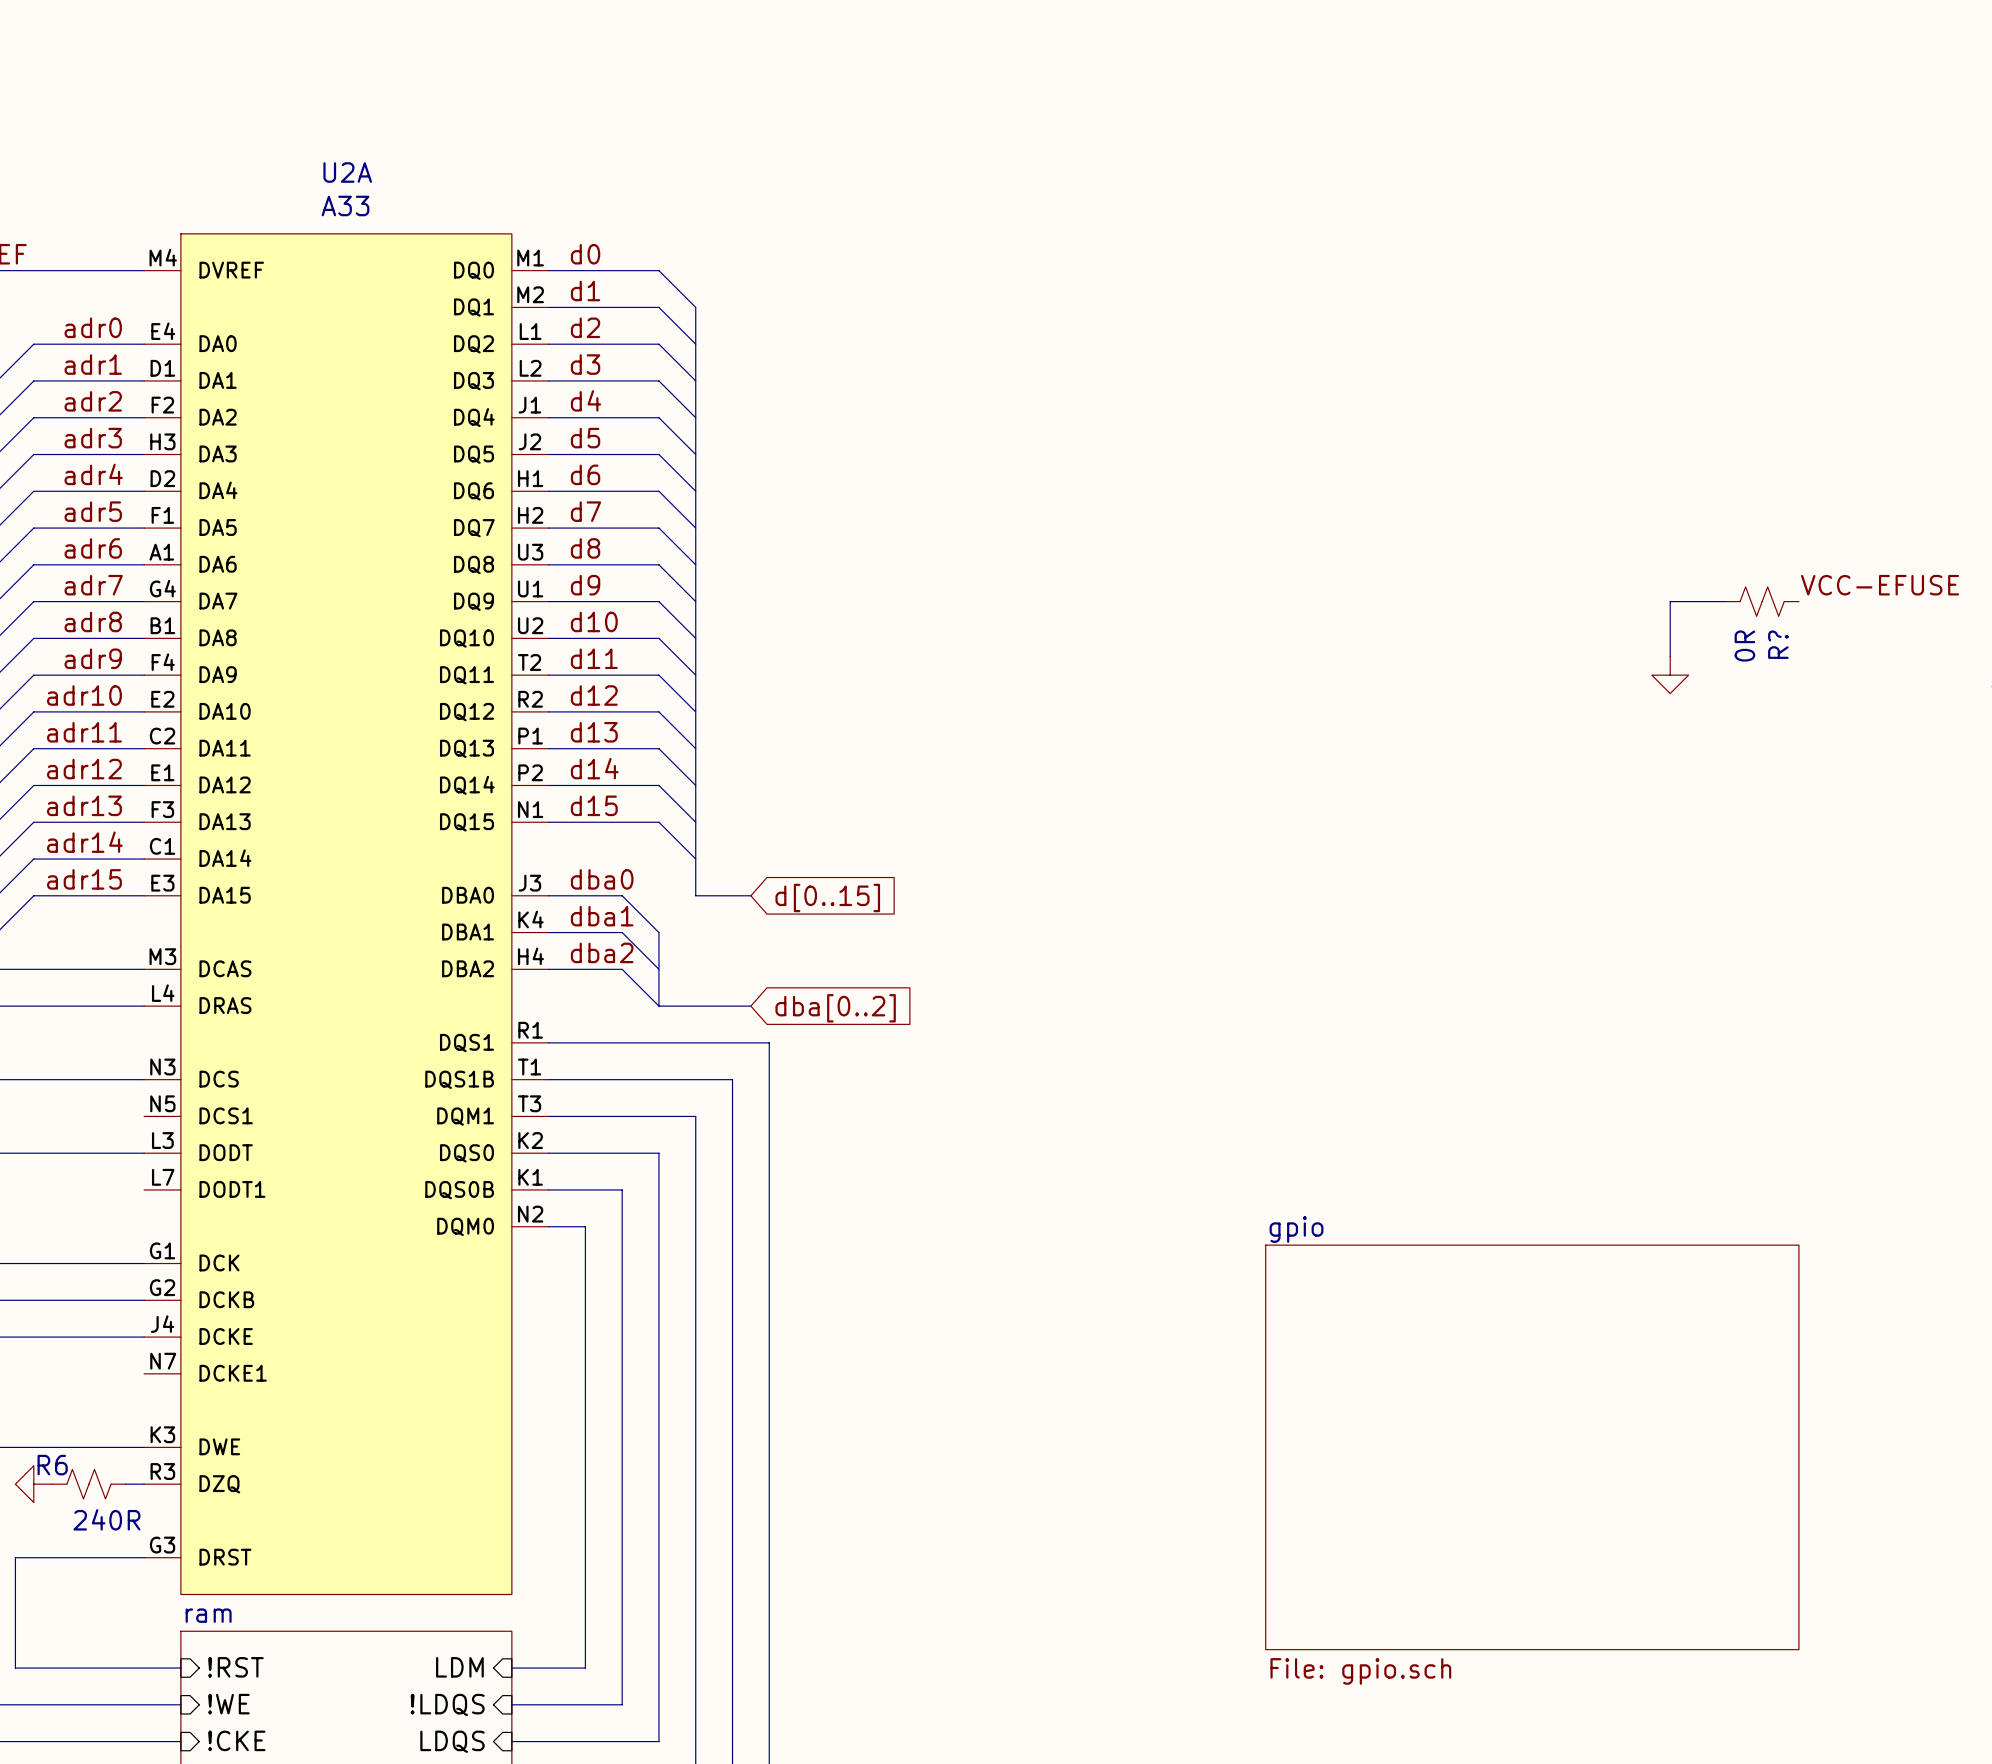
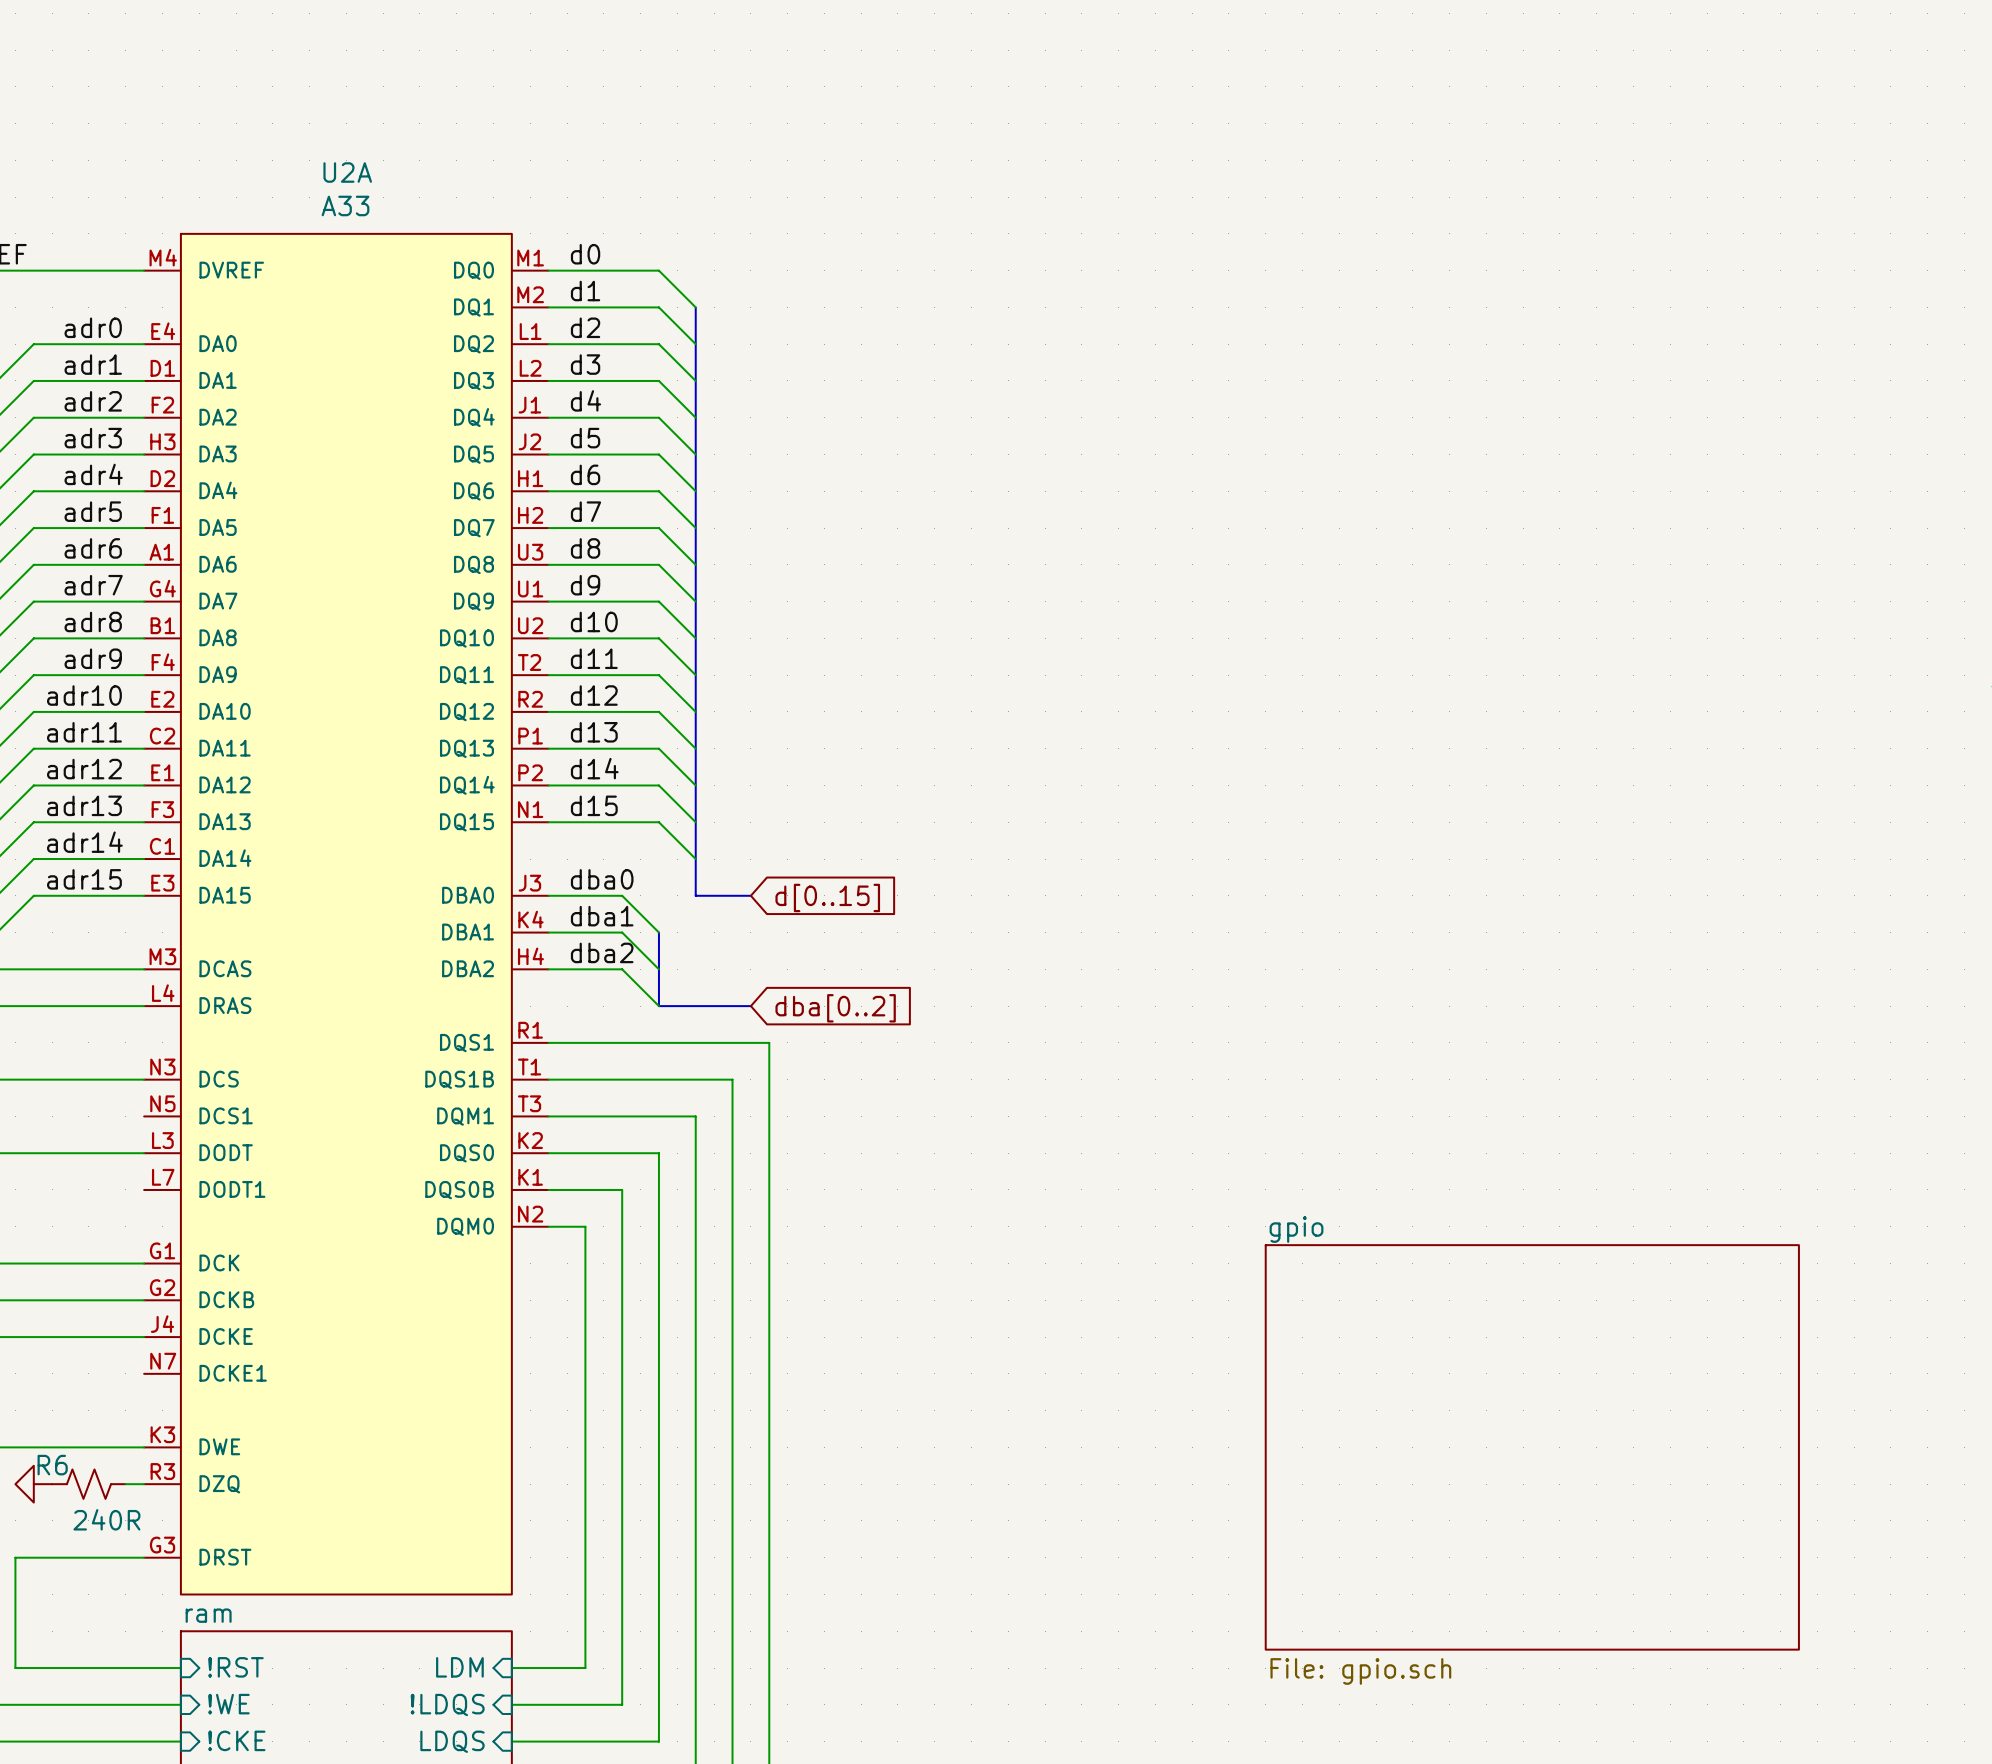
label: VCC-EFUSE (1880, 585) -> none
wire: (1725, 601) (1670, 601) (1670, 656) -> none
R?: 0R (1762, 601) -> none
power symbol: (1670, 675) -> none

